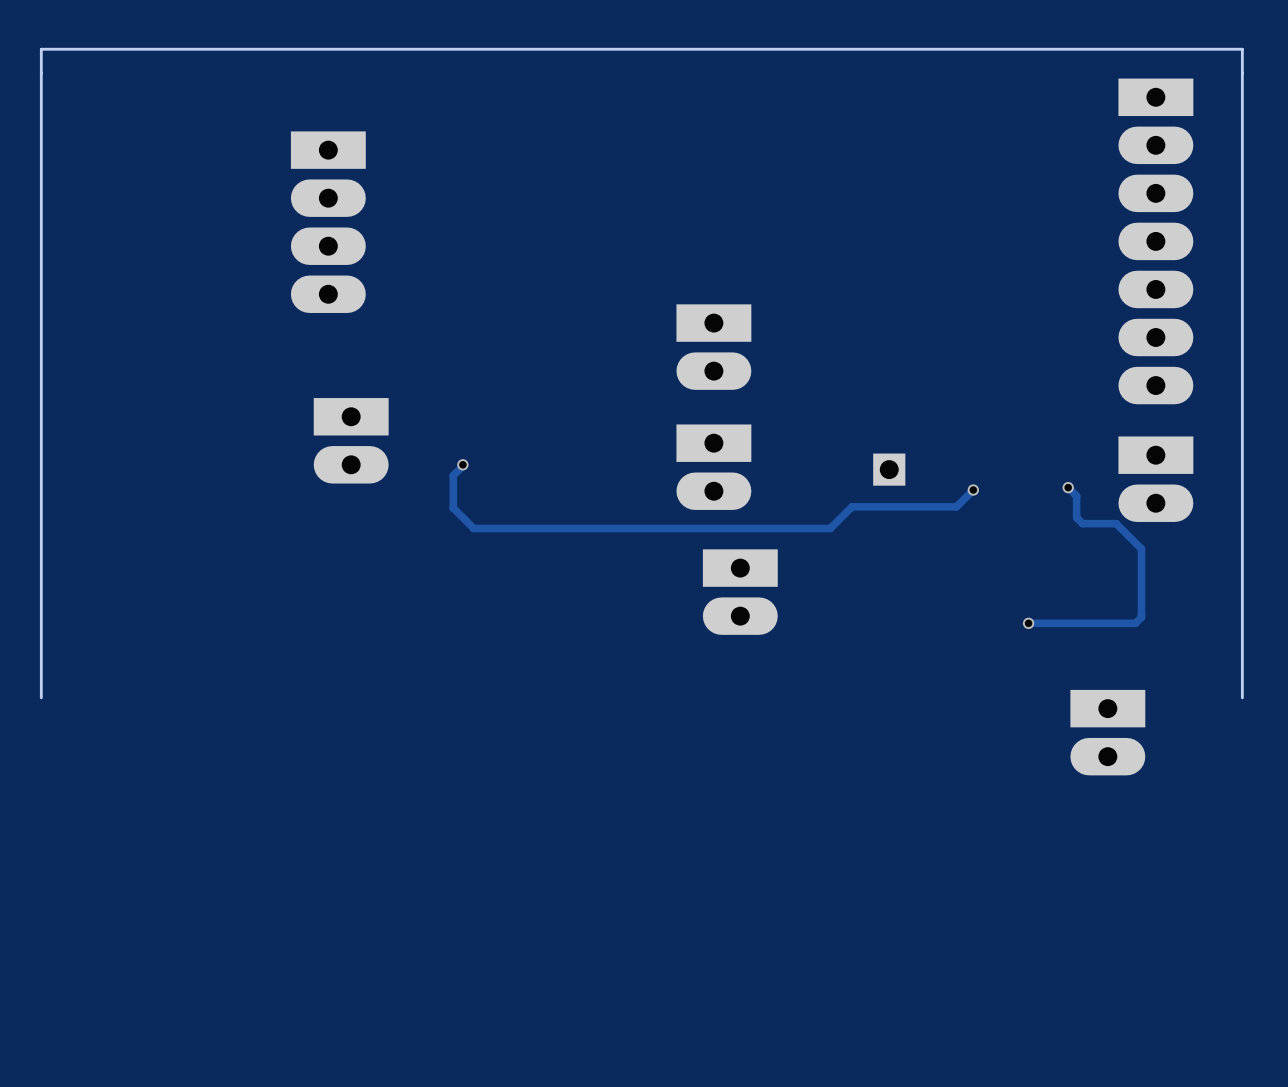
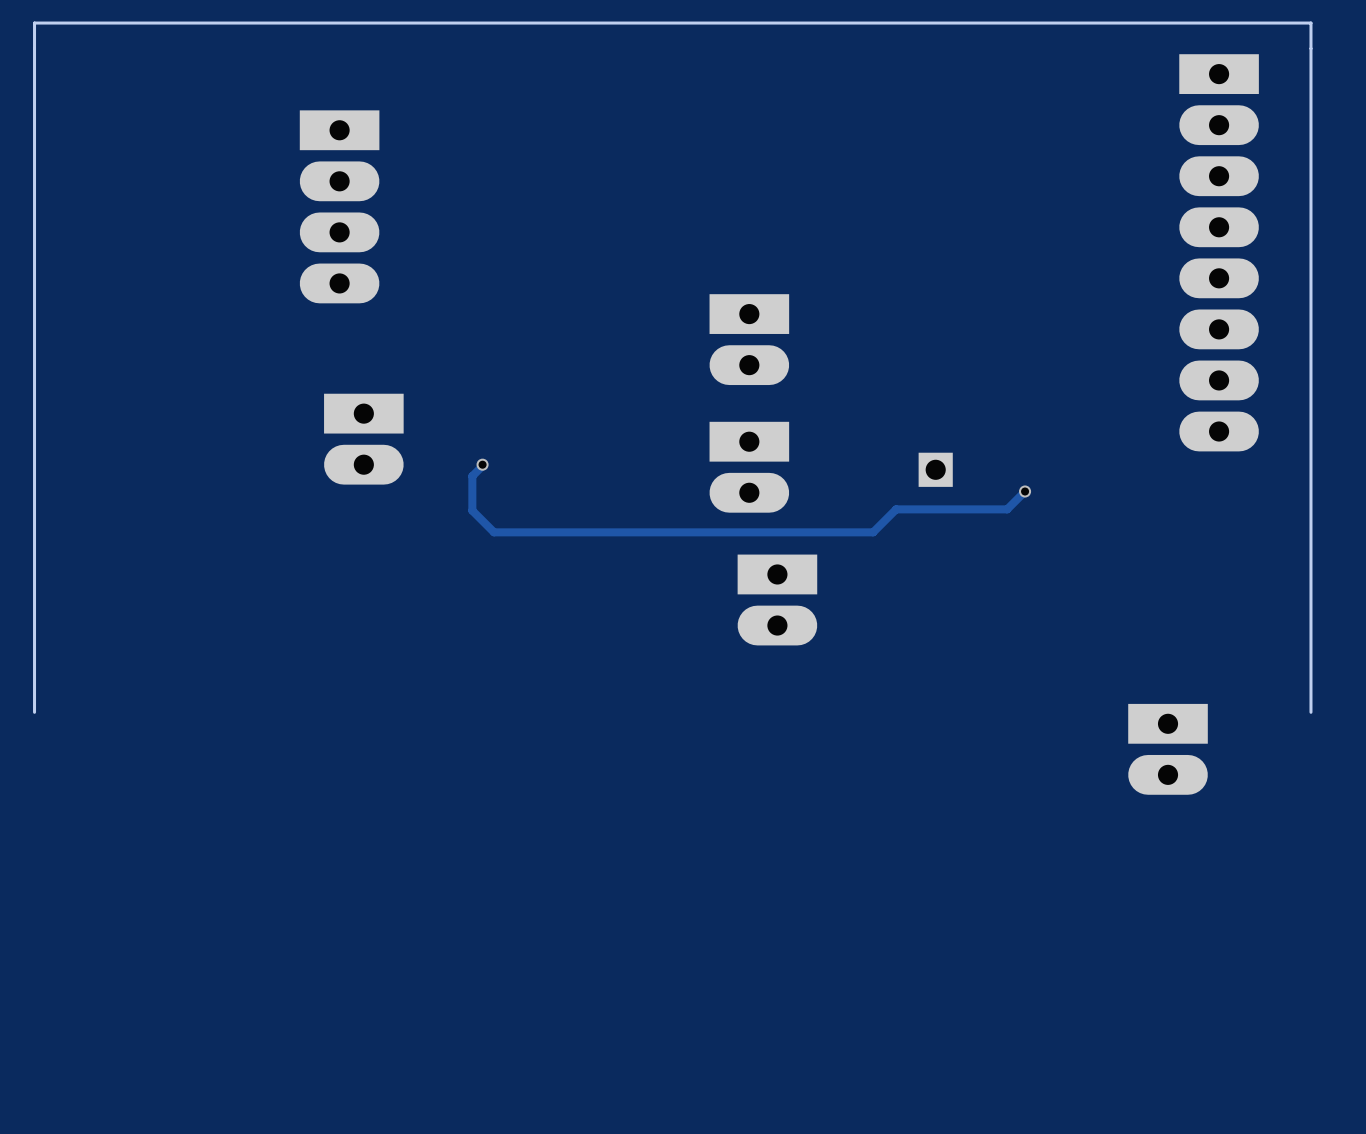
part: none -> (1219, 252)
part: (1155, 479) -> none
track: (1068, 487) (1076, 496) (1076, 517) (1082, 523) (1116, 523) (1141, 548) (1141, 617) (1135, 623) (1028, 623) -> none
via: (1068, 487) -> none
via: (1028, 623) -> none

